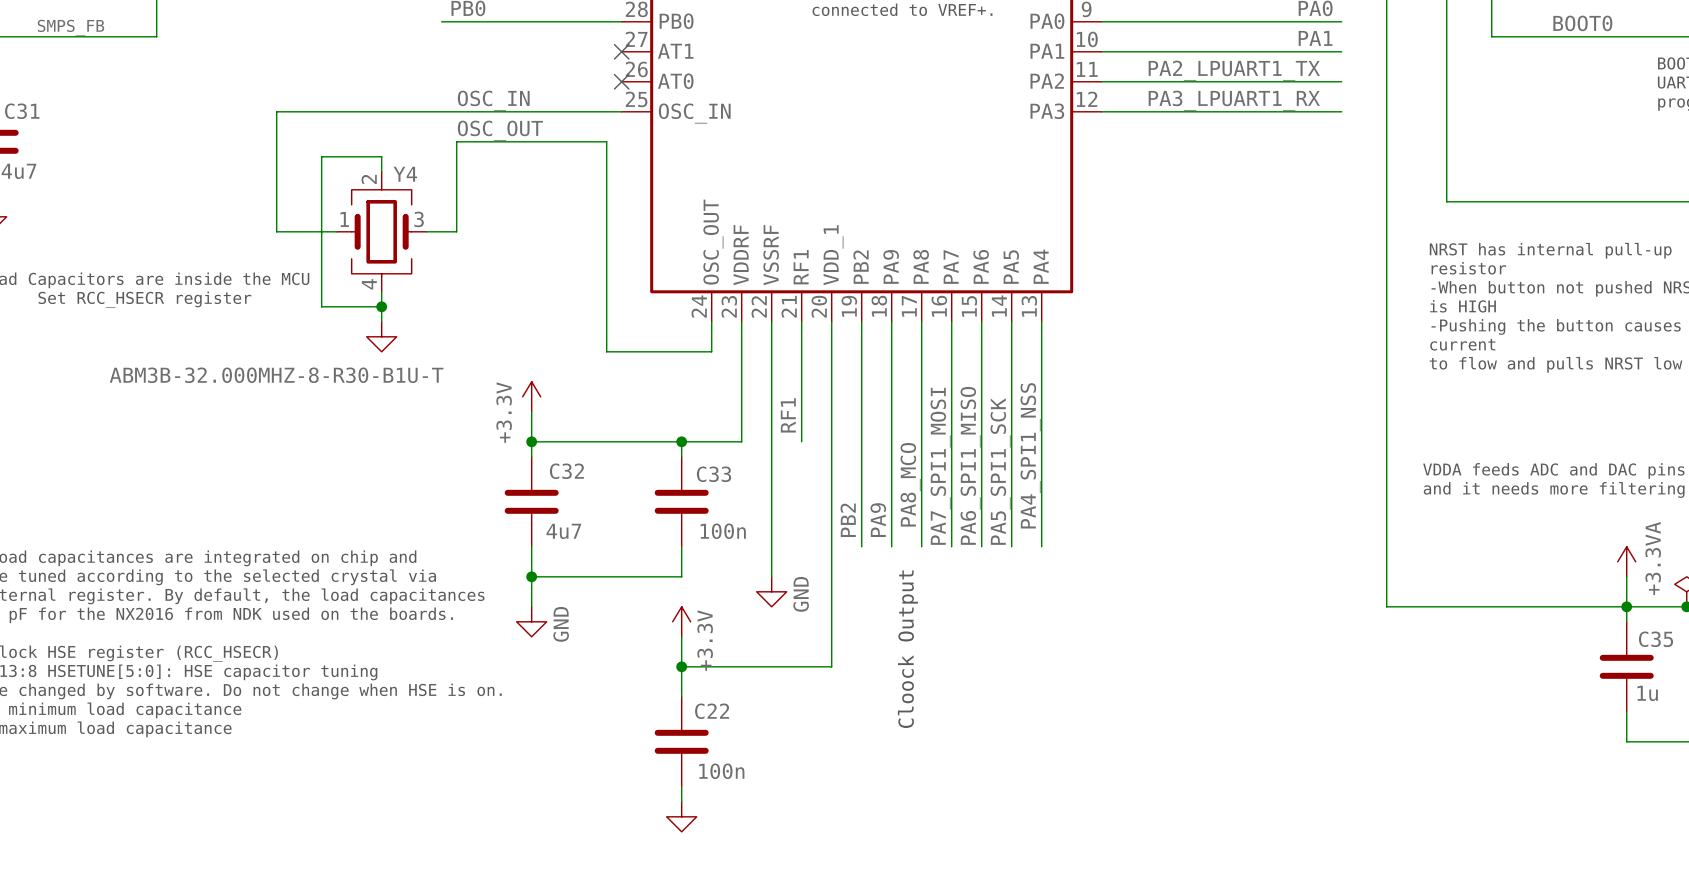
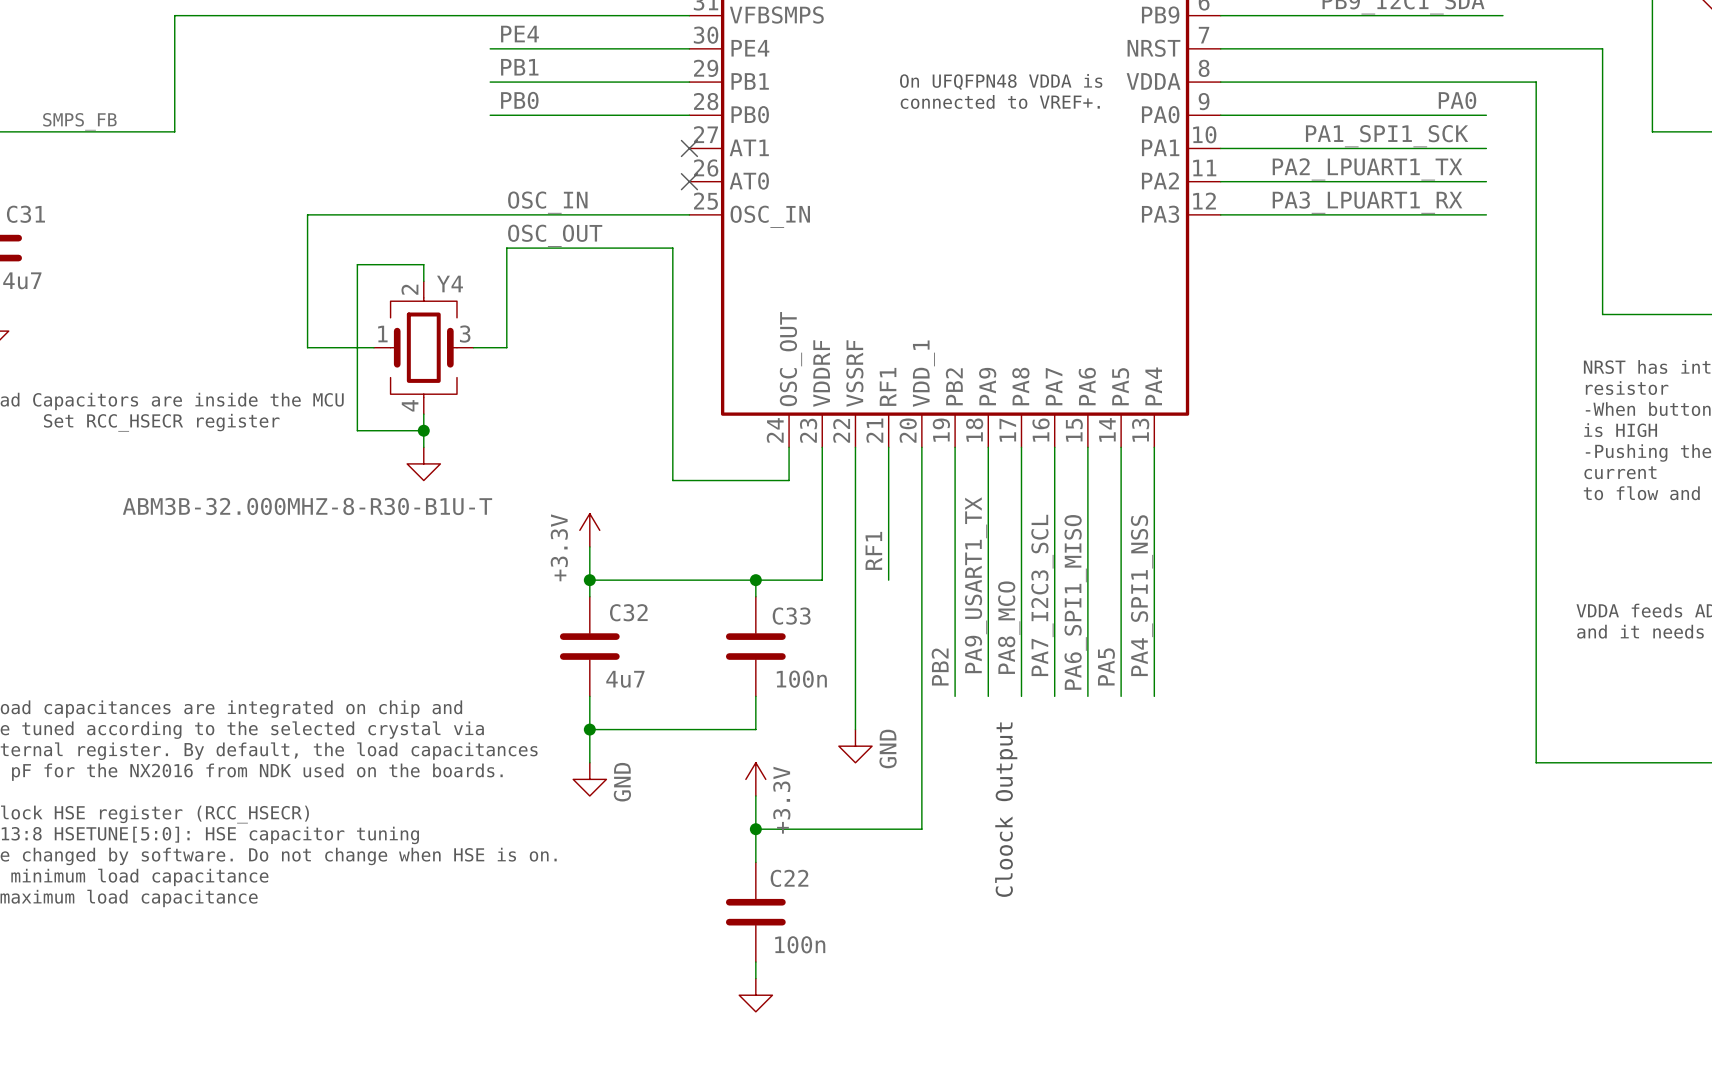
label: PA1 (1315, 38) -> none
label: none -> PA1_SPI1_SCK (1387, 136)
label: none -> PA9_USART1_TX (976, 585)
label: none -> PA7_I2C3_SCL (1042, 595)
label position: PA6_SPI1_MISO (970, 465) -> PA6_SPI1_MISO (1075, 602)
label: PA7_SPI1_MOSI (940, 466) -> none
label: PA5_SPI1_SCK (1000, 471) -> none
label: PA9 (878, 520) -> none
label: none -> PA5 (1106, 666)

